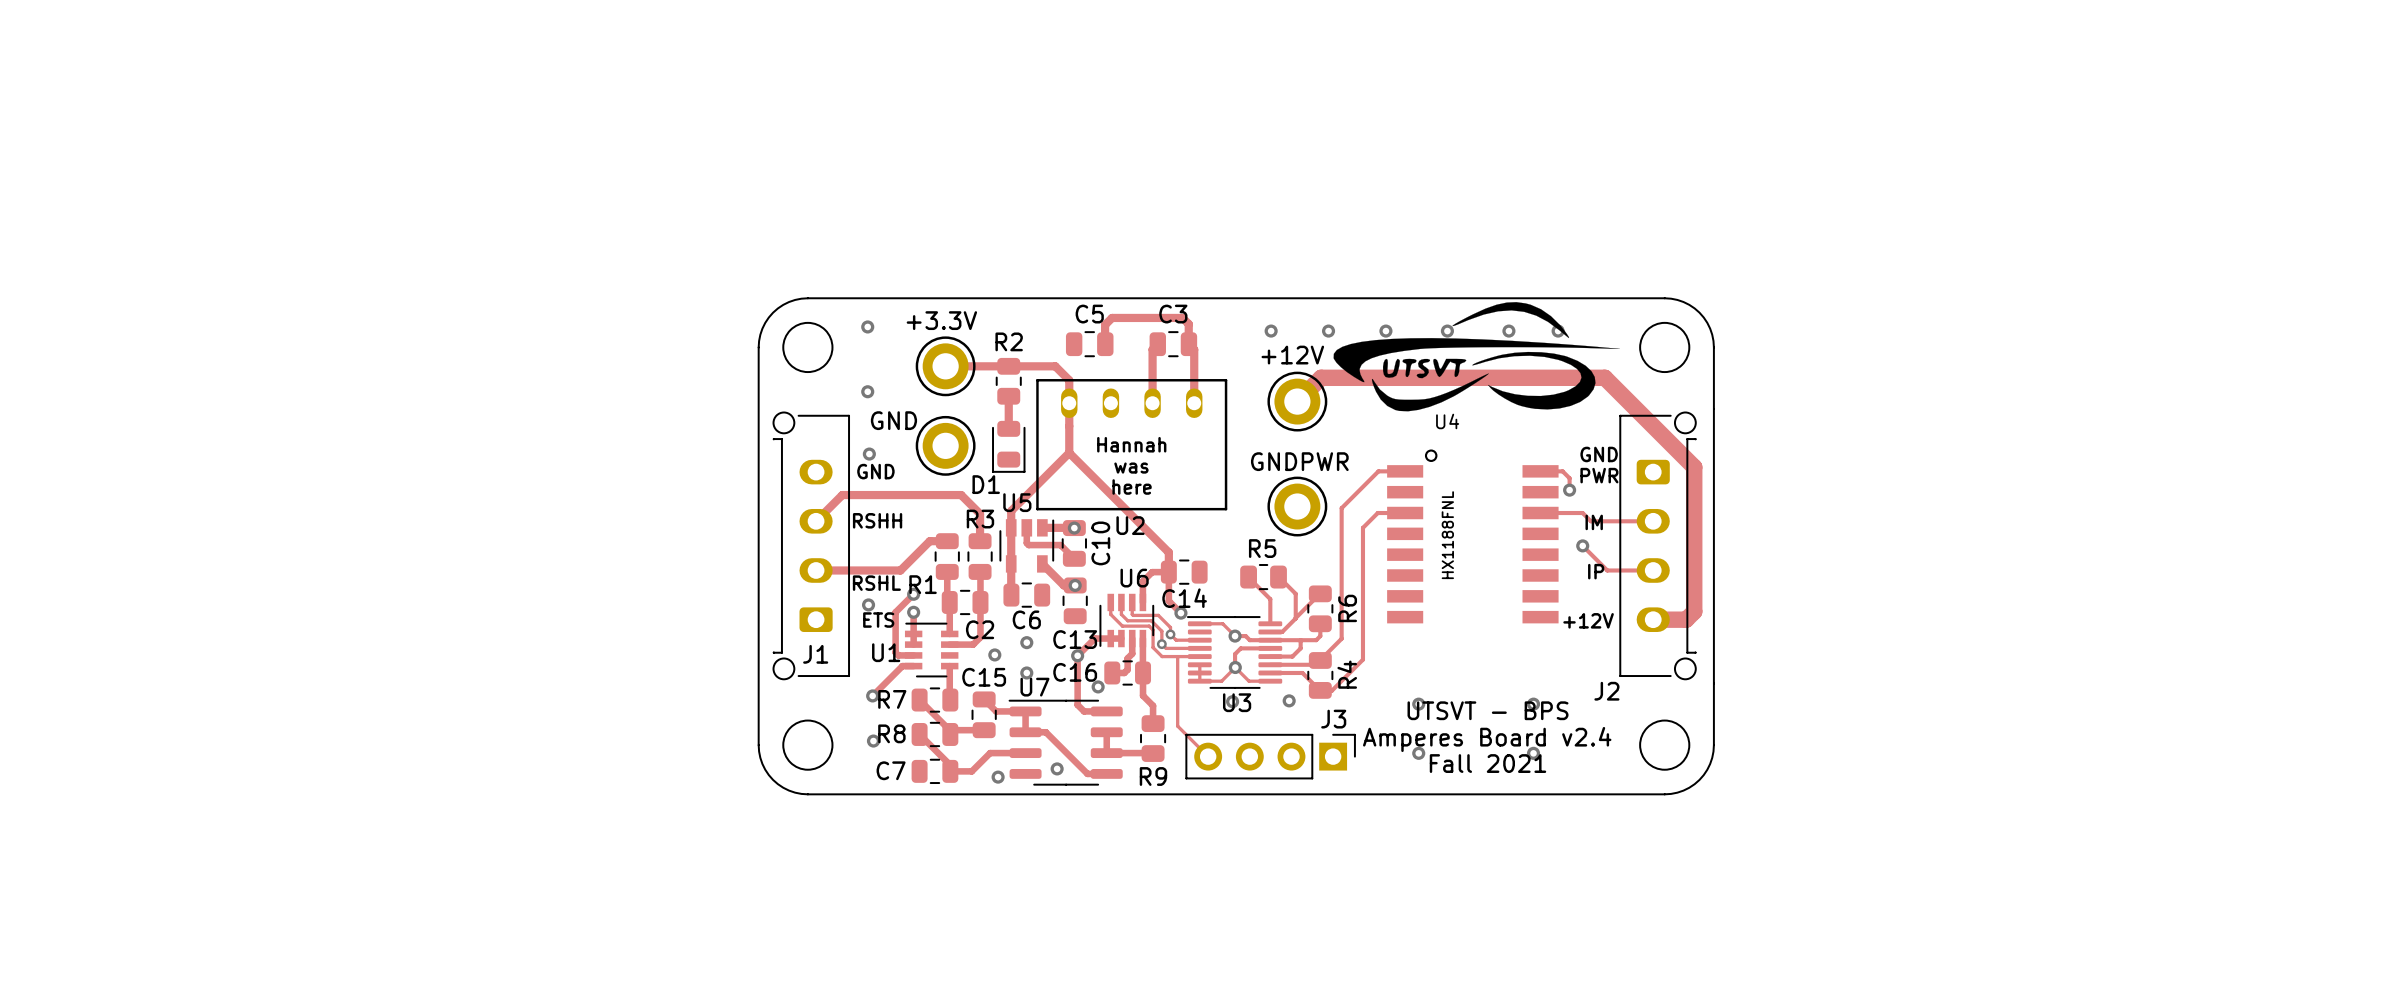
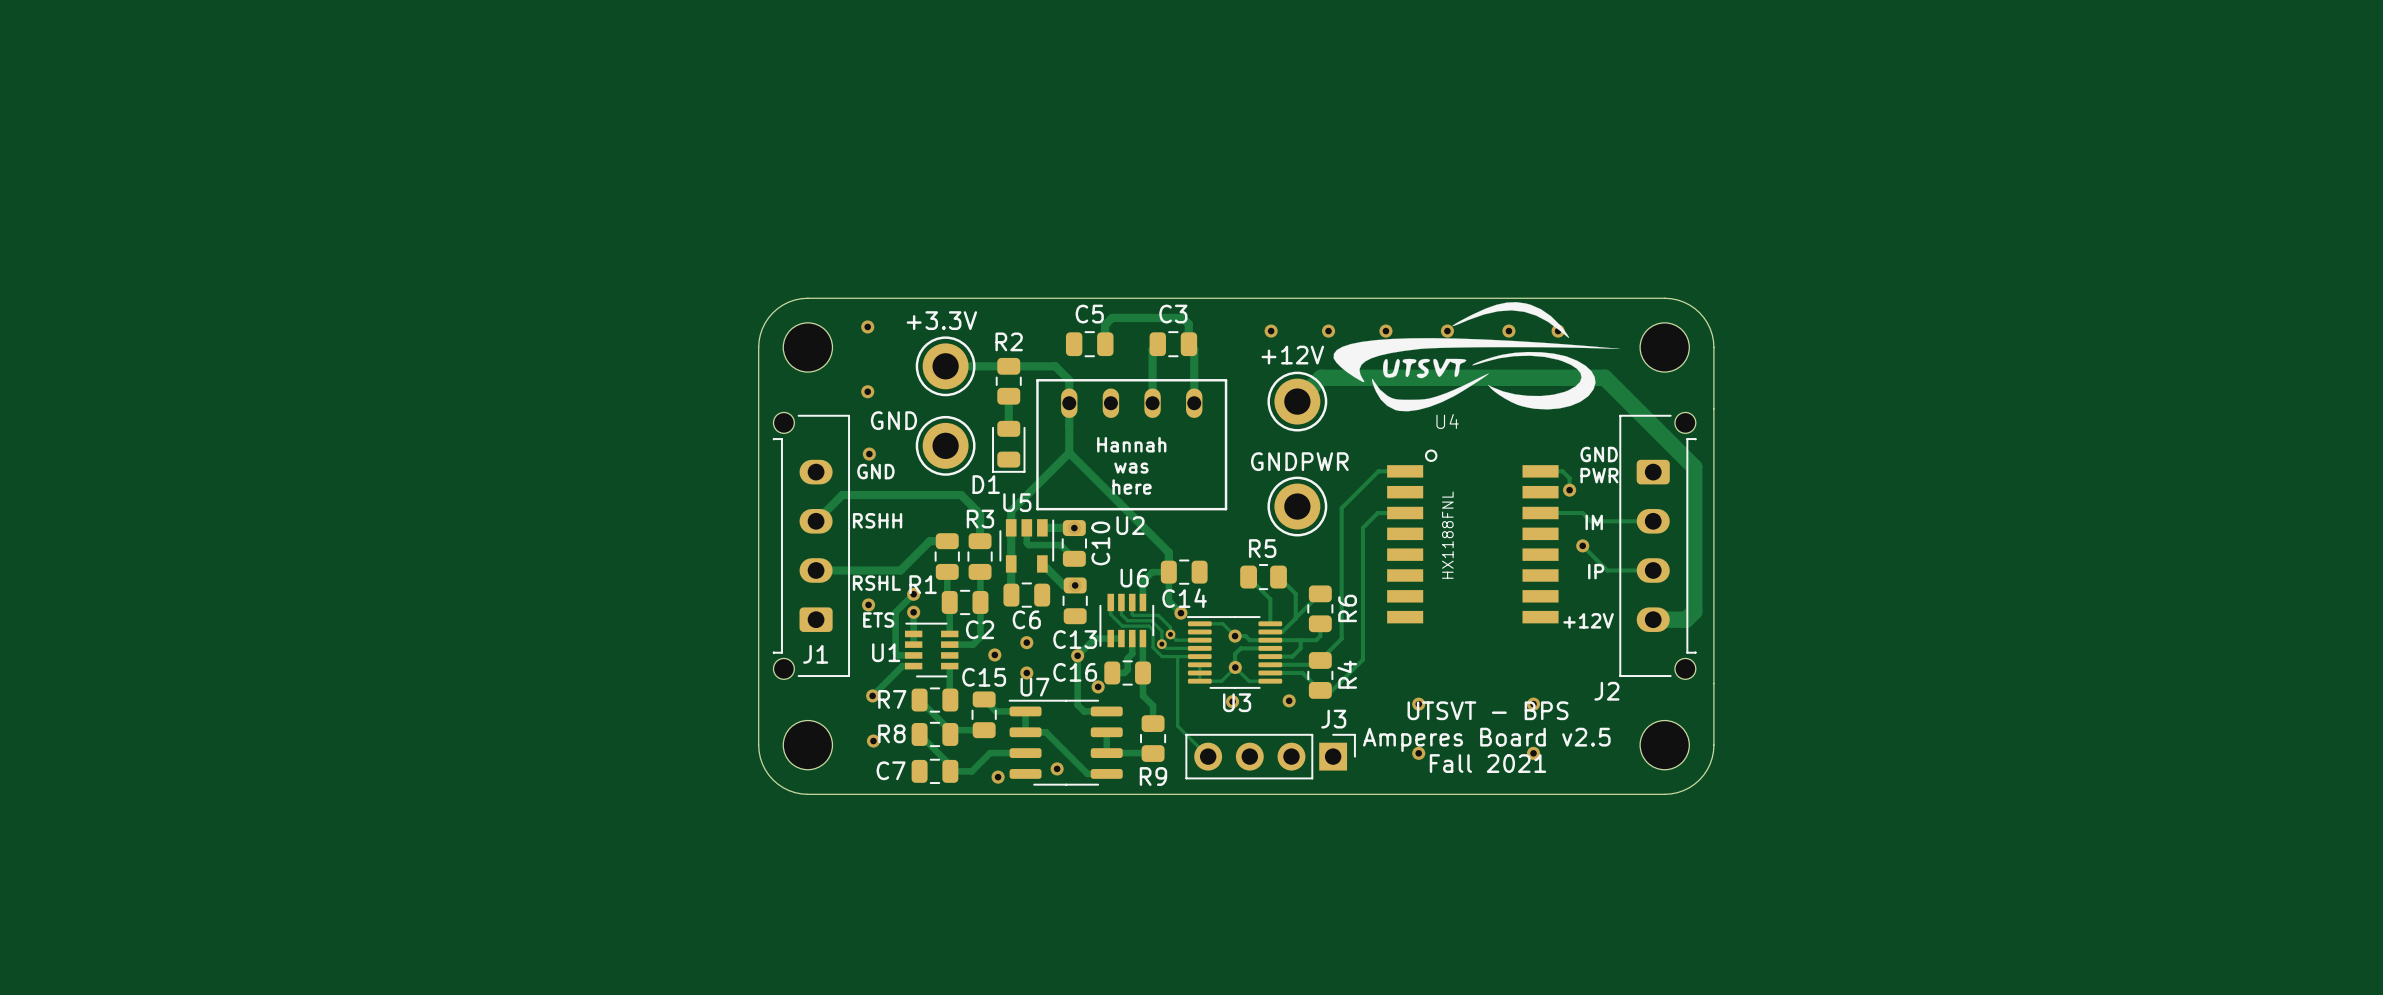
text: Amperes Board v2.4 (1487, 739) -> Amperes Board v2.5 (1486, 739)

